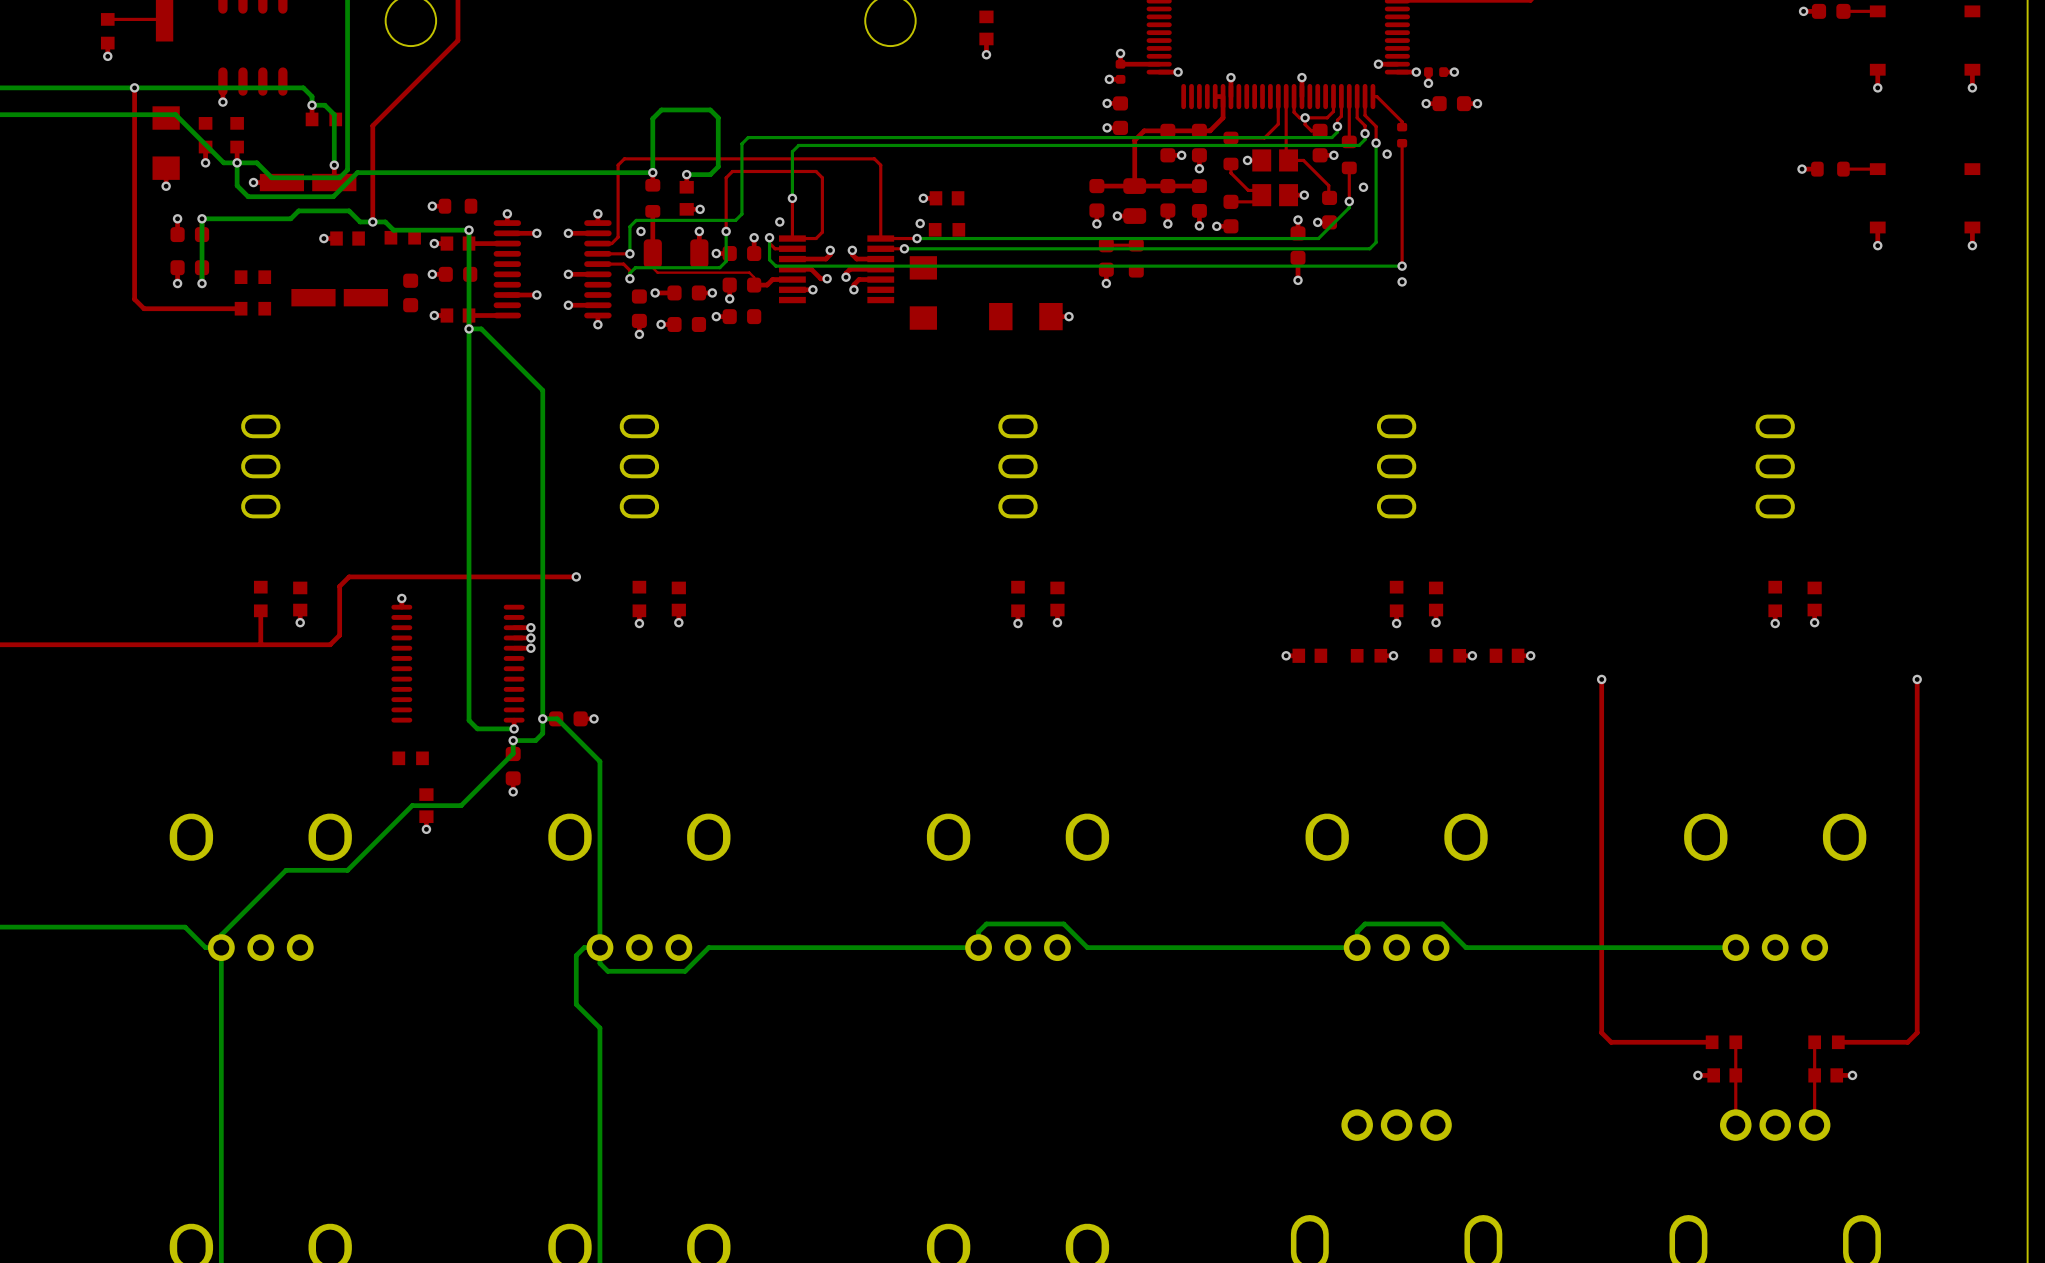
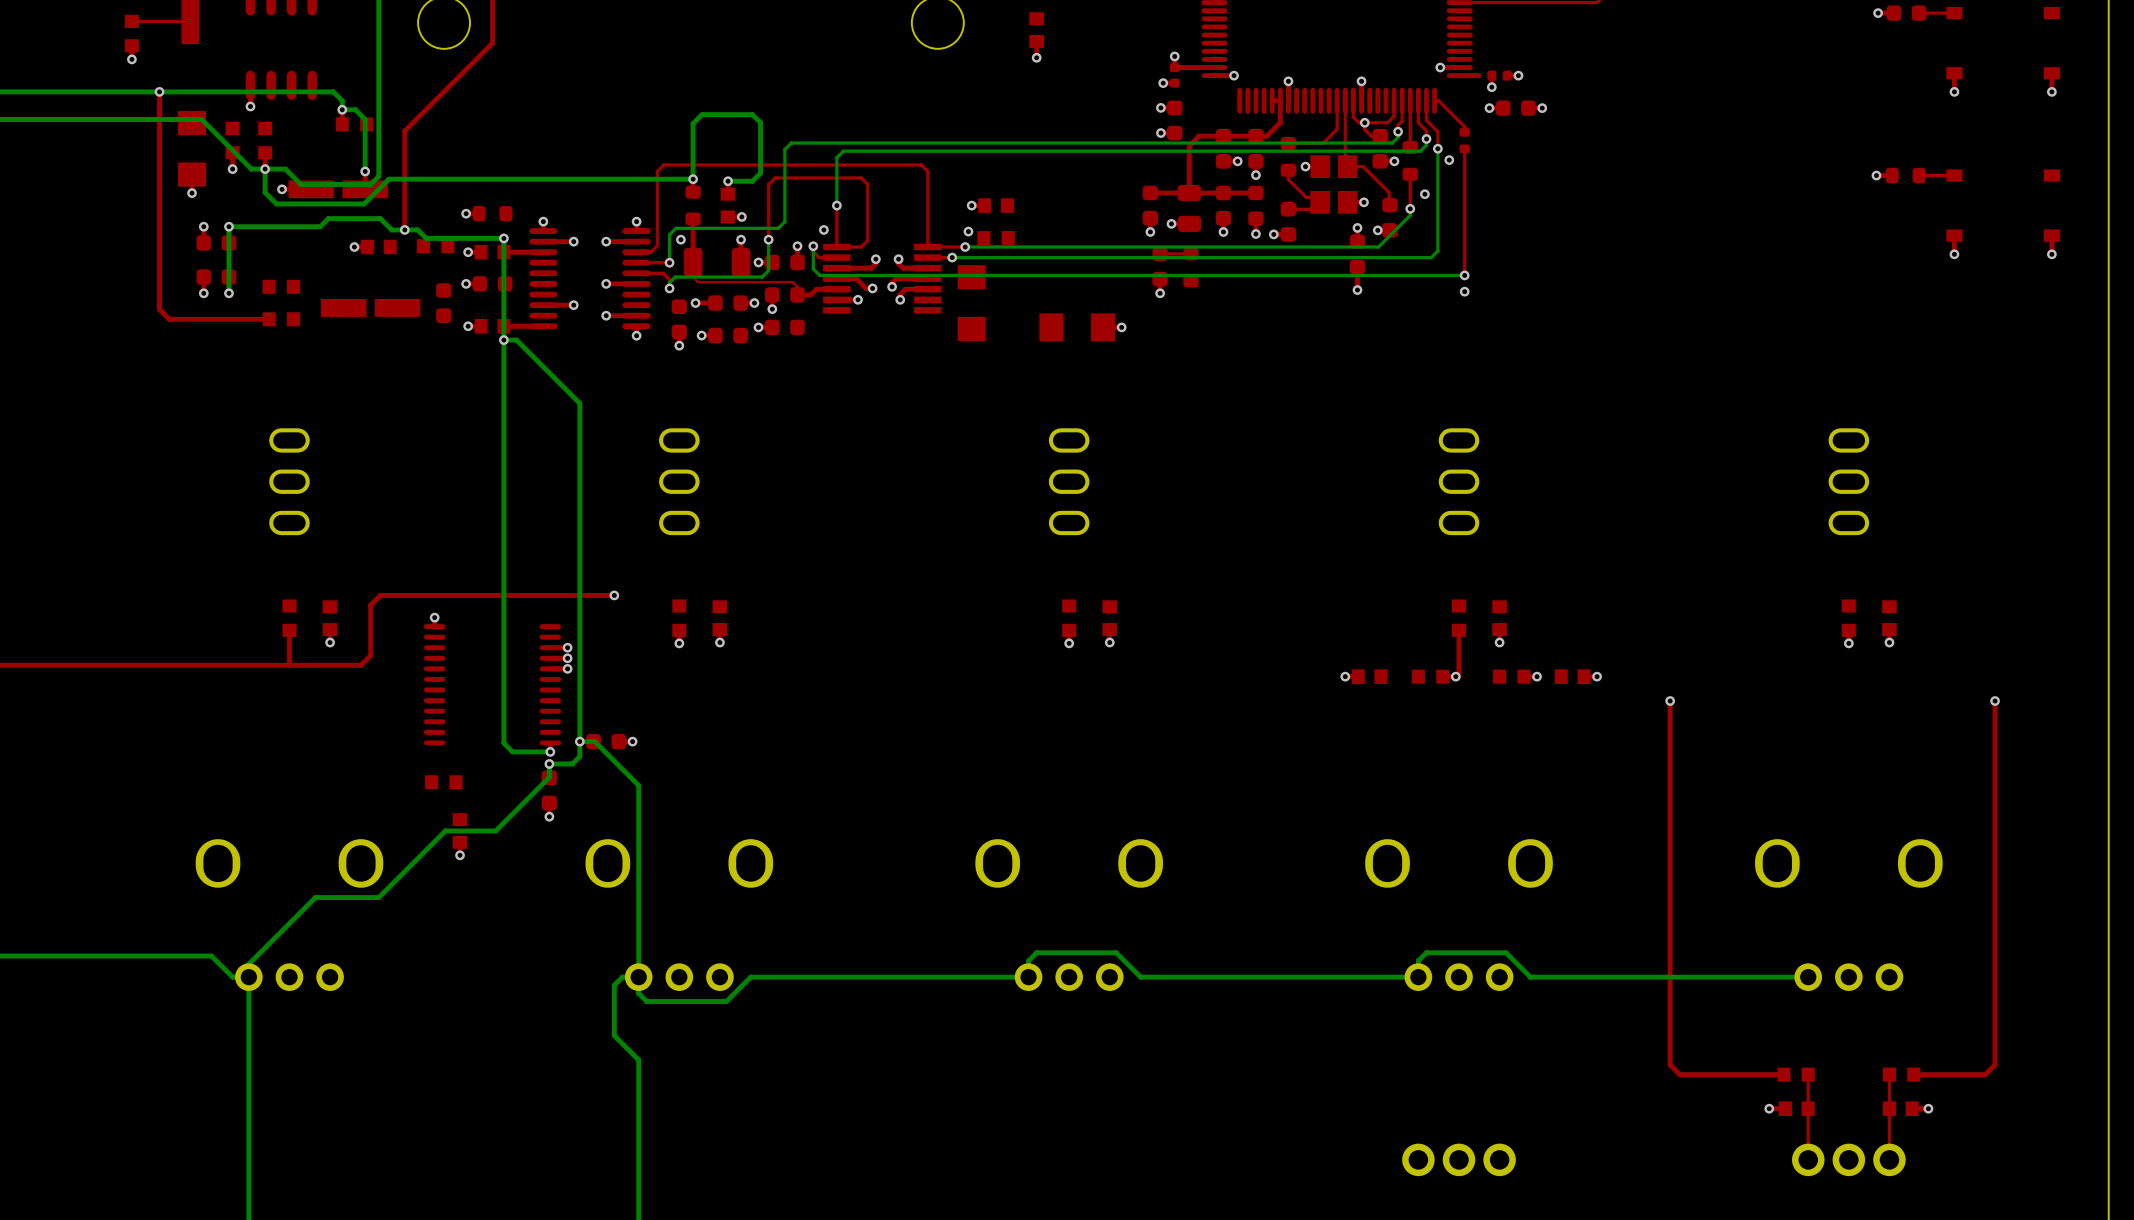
via: (1416, 72) -> none
top track: none -> (1459, 643) (1459, 676) (1455, 676)
via: (1396, 623) -> none

